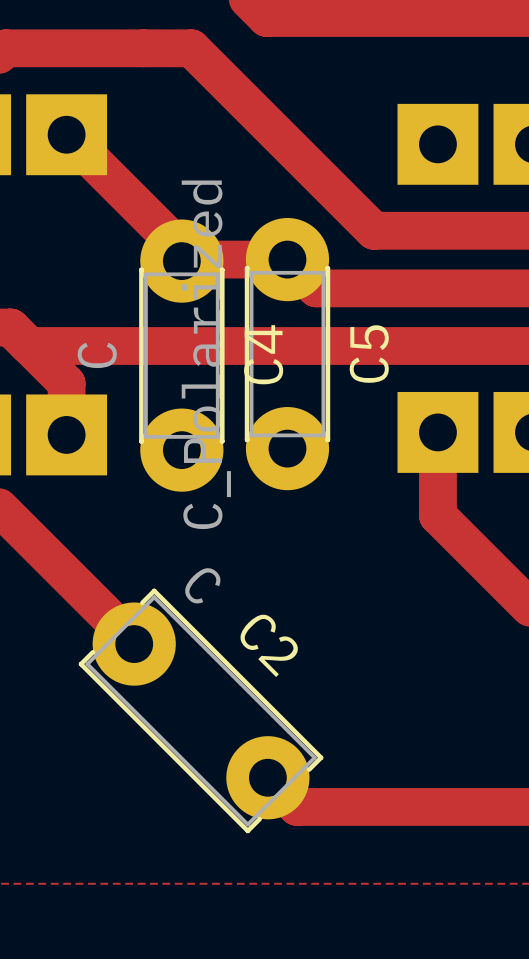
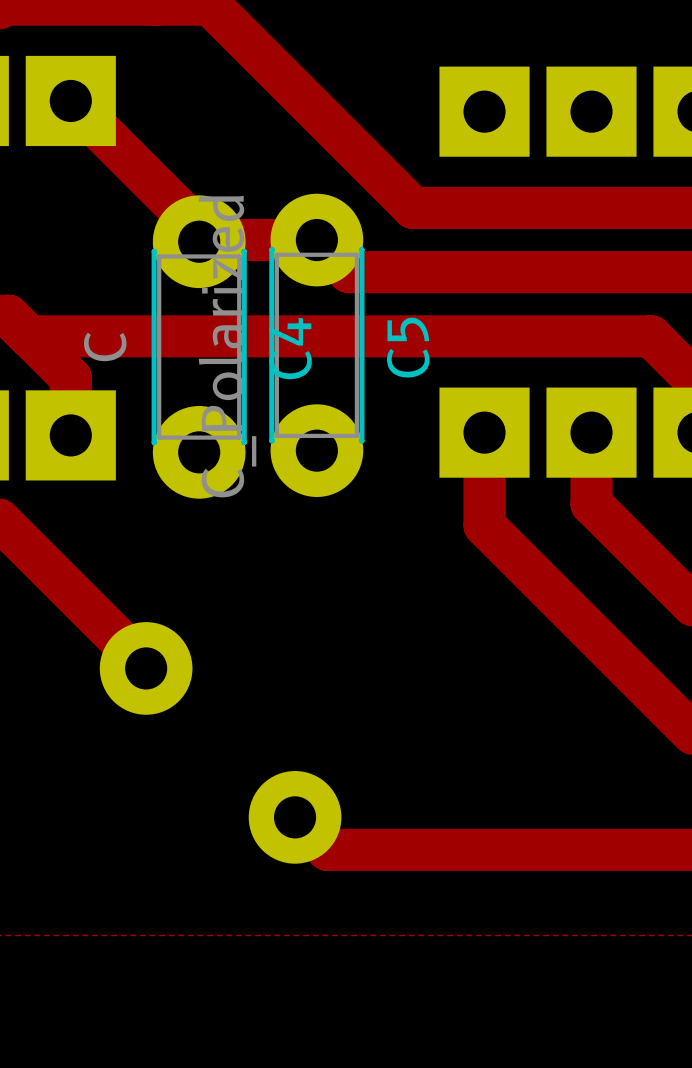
C2 side: top (201, 710) -> bottom (220, 742)

